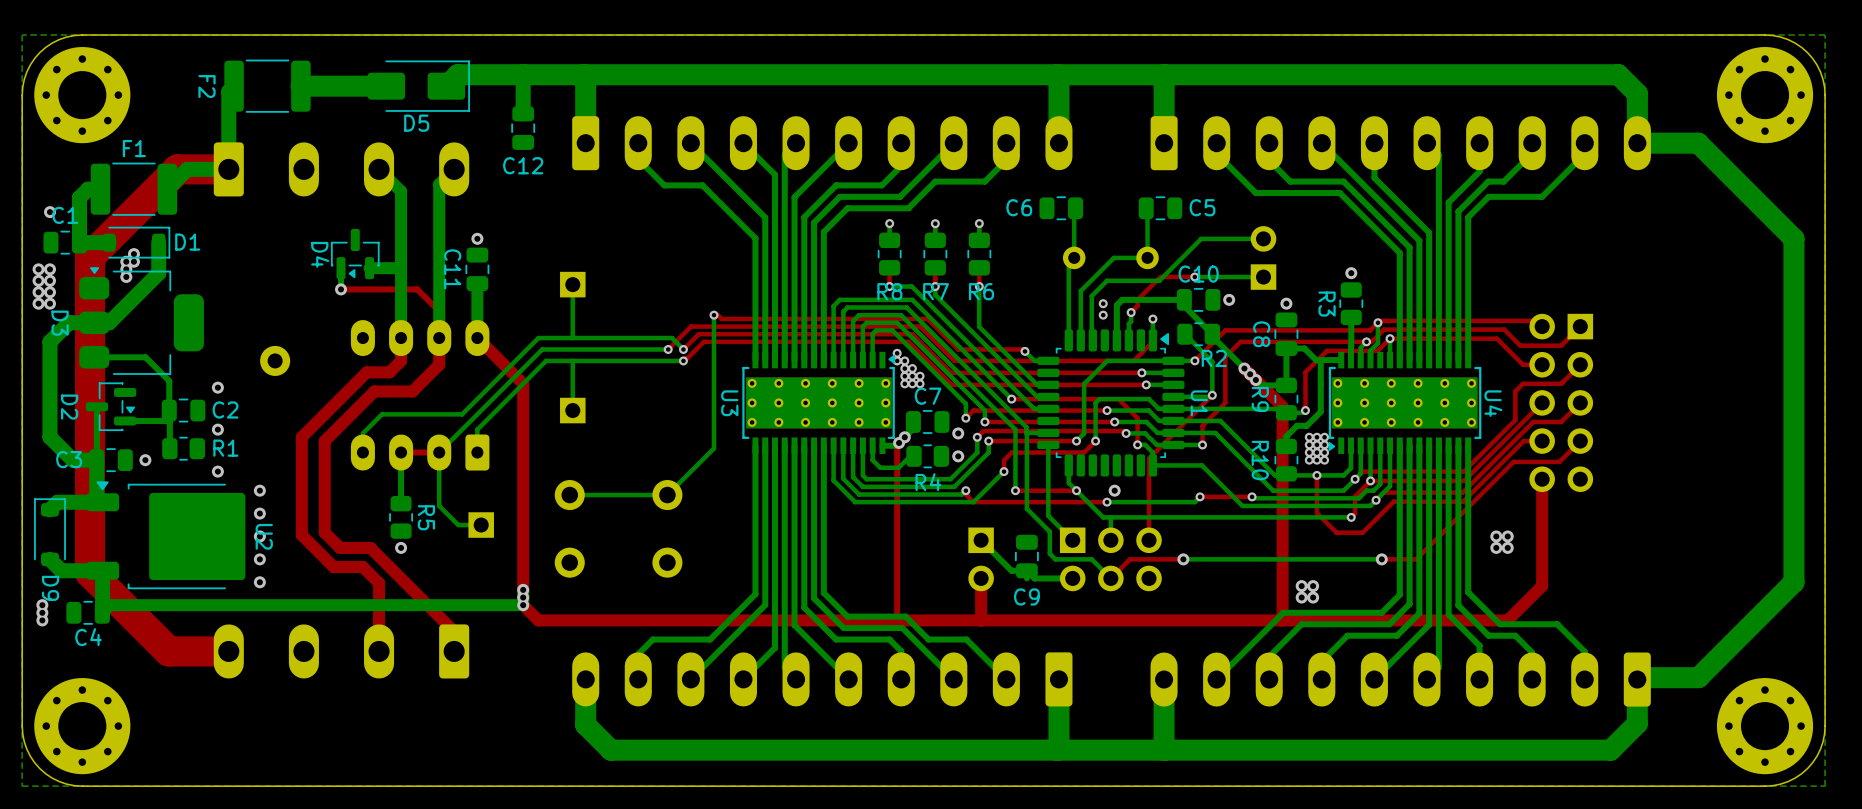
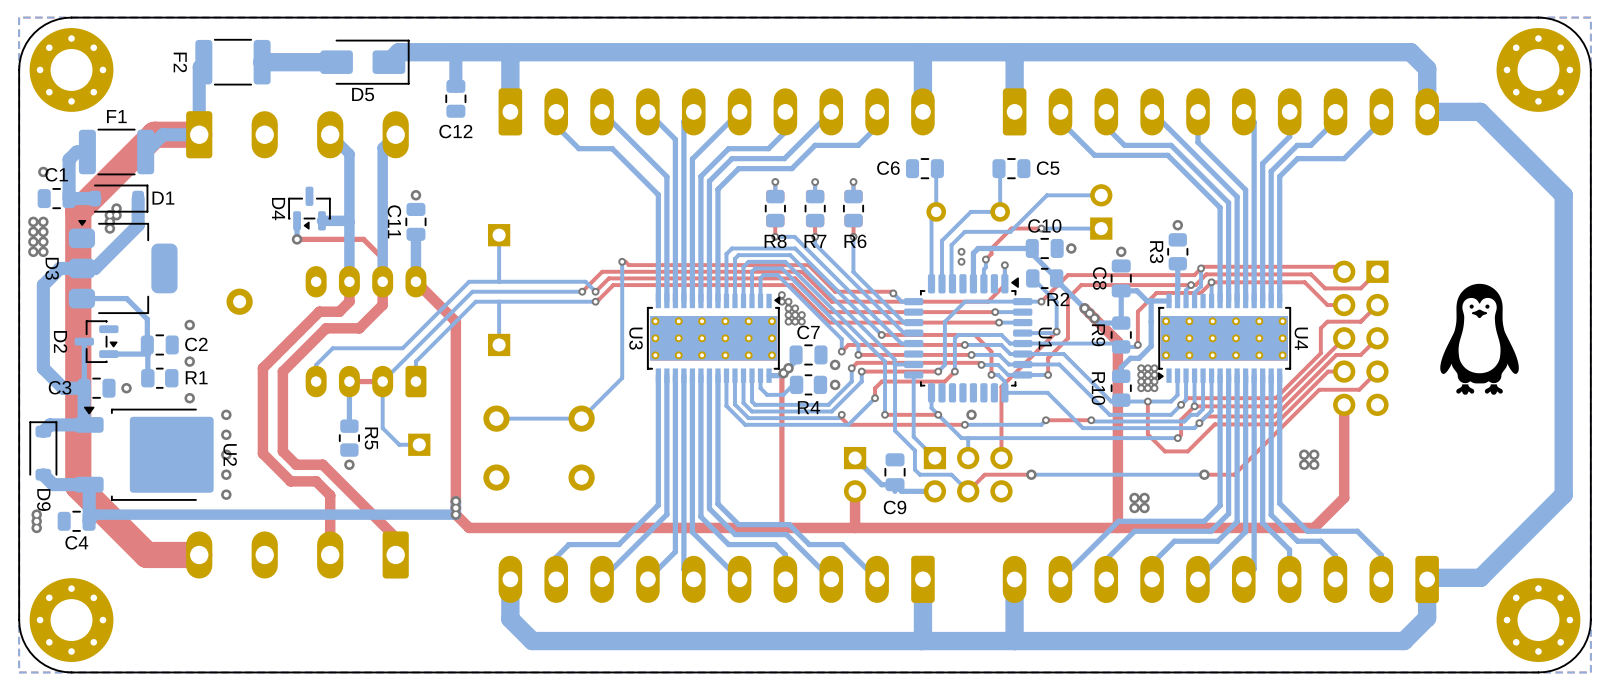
drawing: none -> [1440, 283, 1519, 395]

